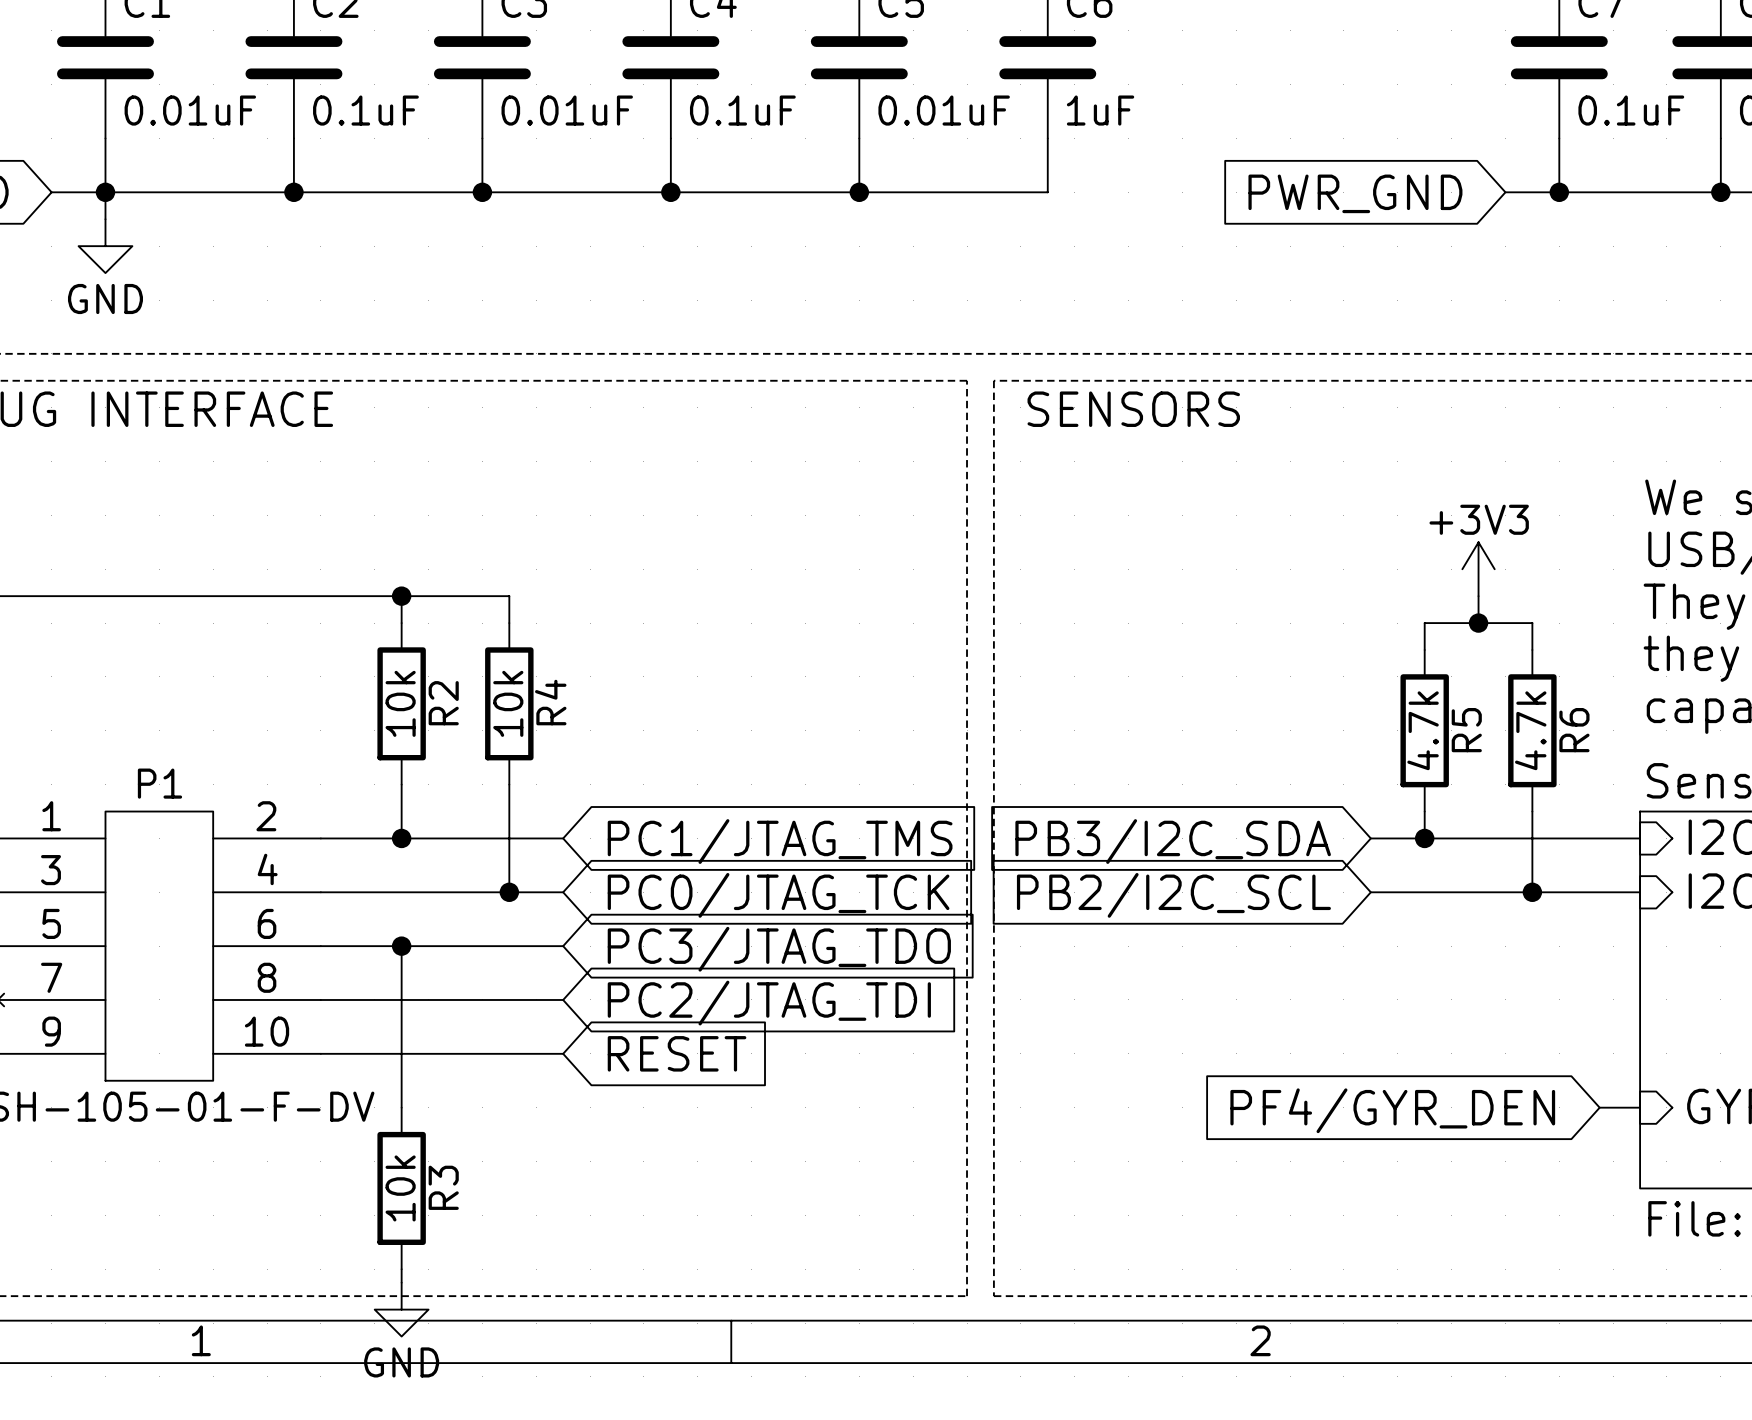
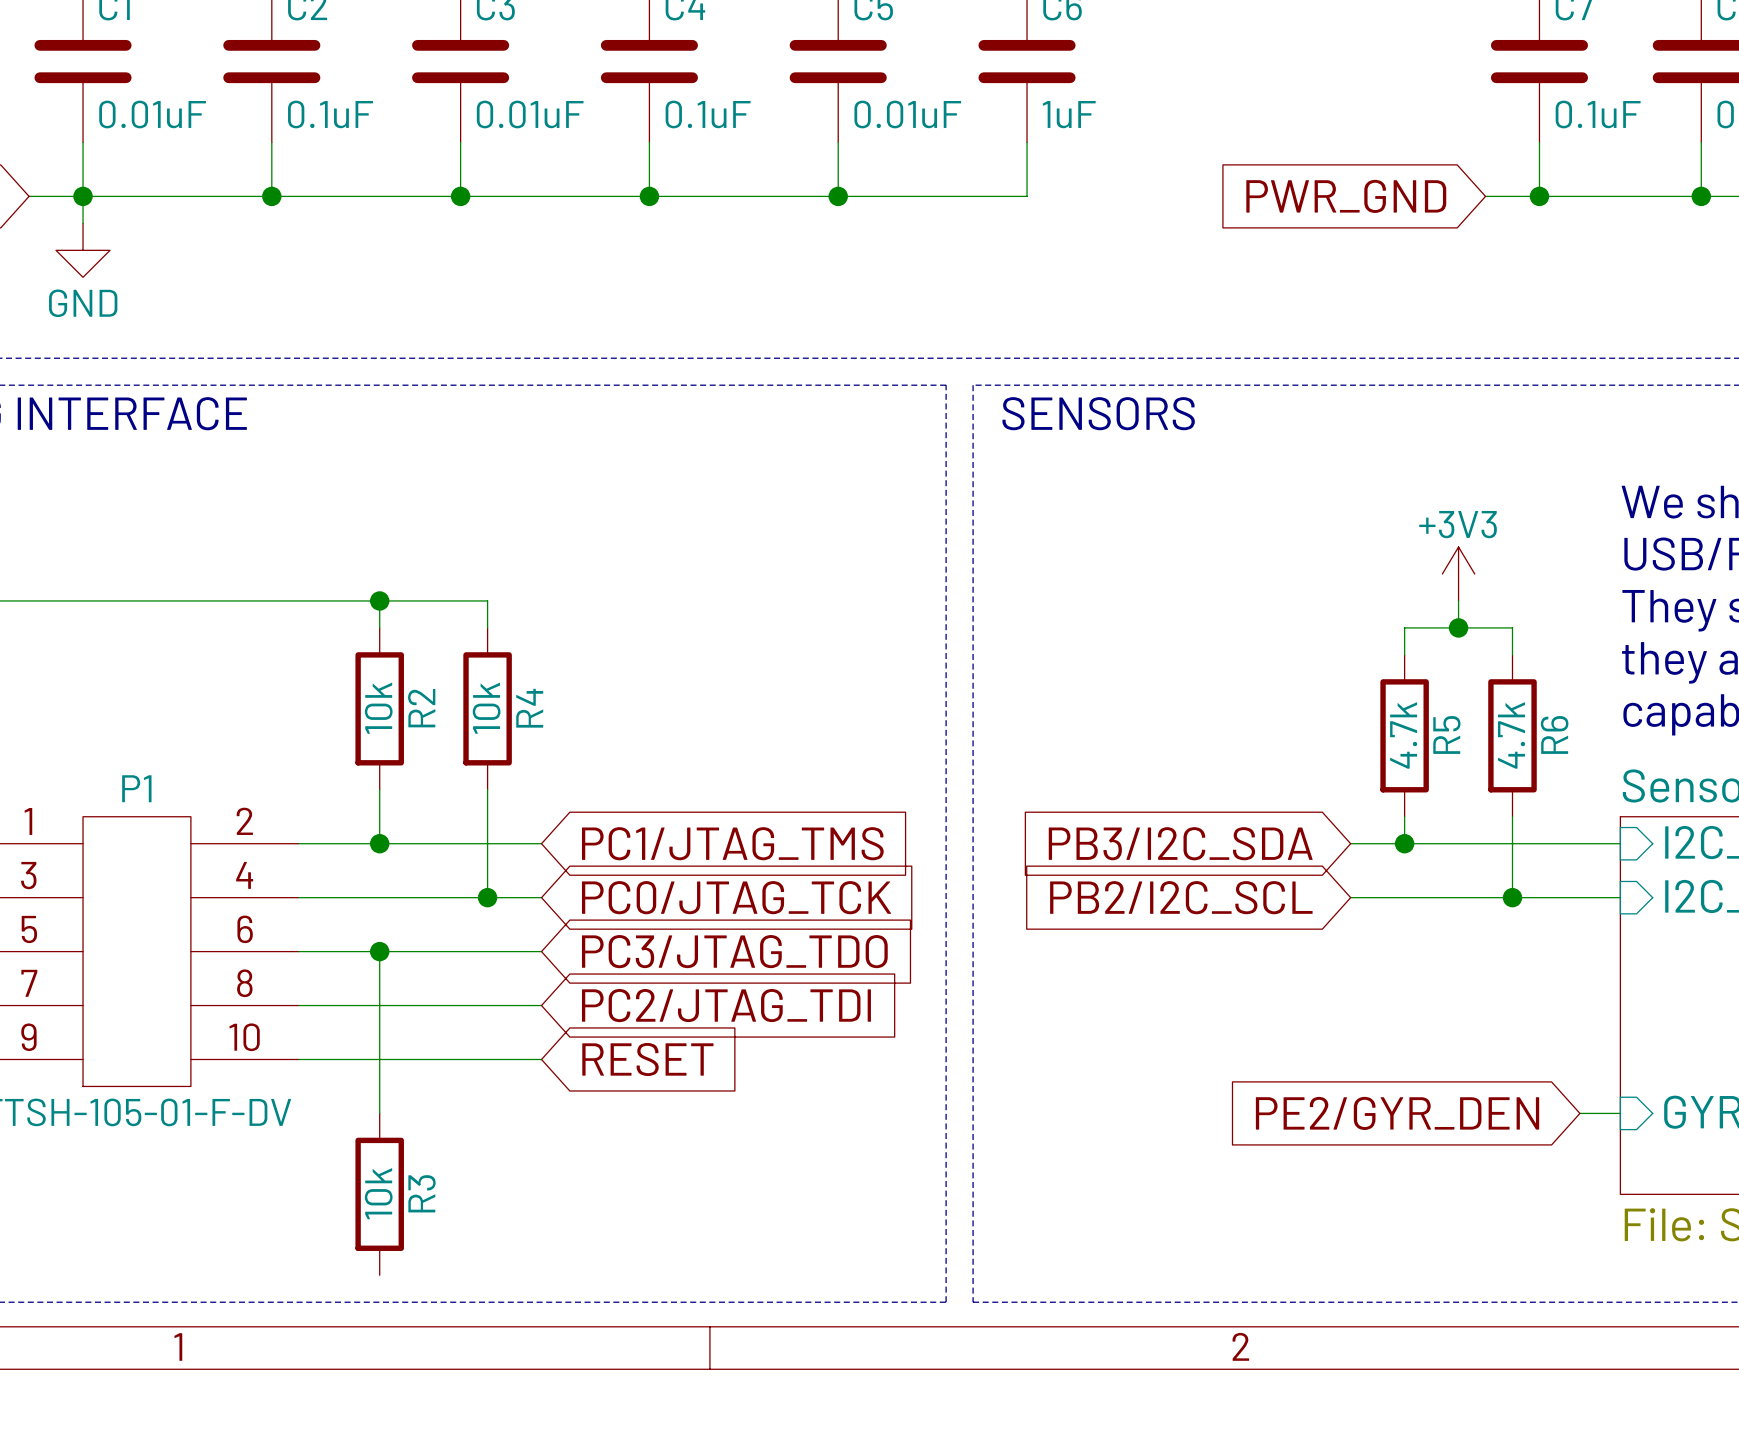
global label: PF4/GYR_DEN (1392, 1110) -> PE2/GYR_DEN (1397, 1113)
wire: (401, 1269) (401, 1282) -> none
power symbol: GND (401, 1309) -> none

